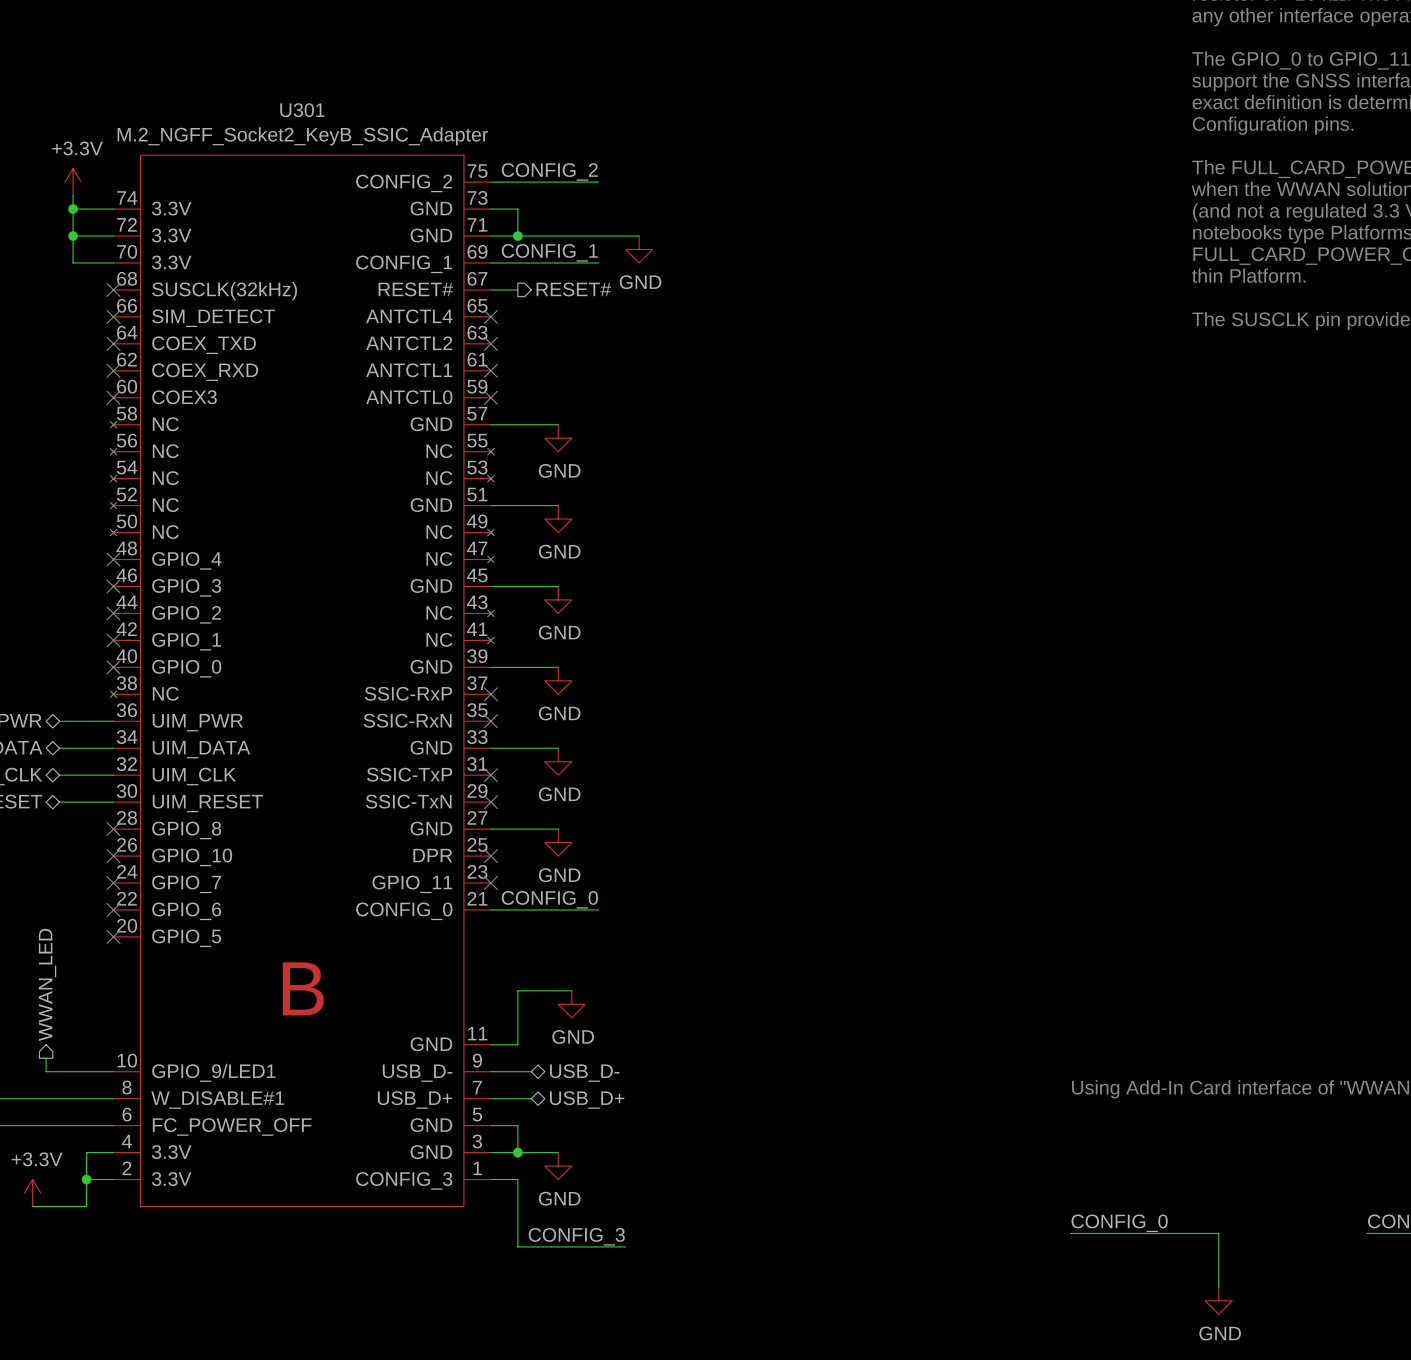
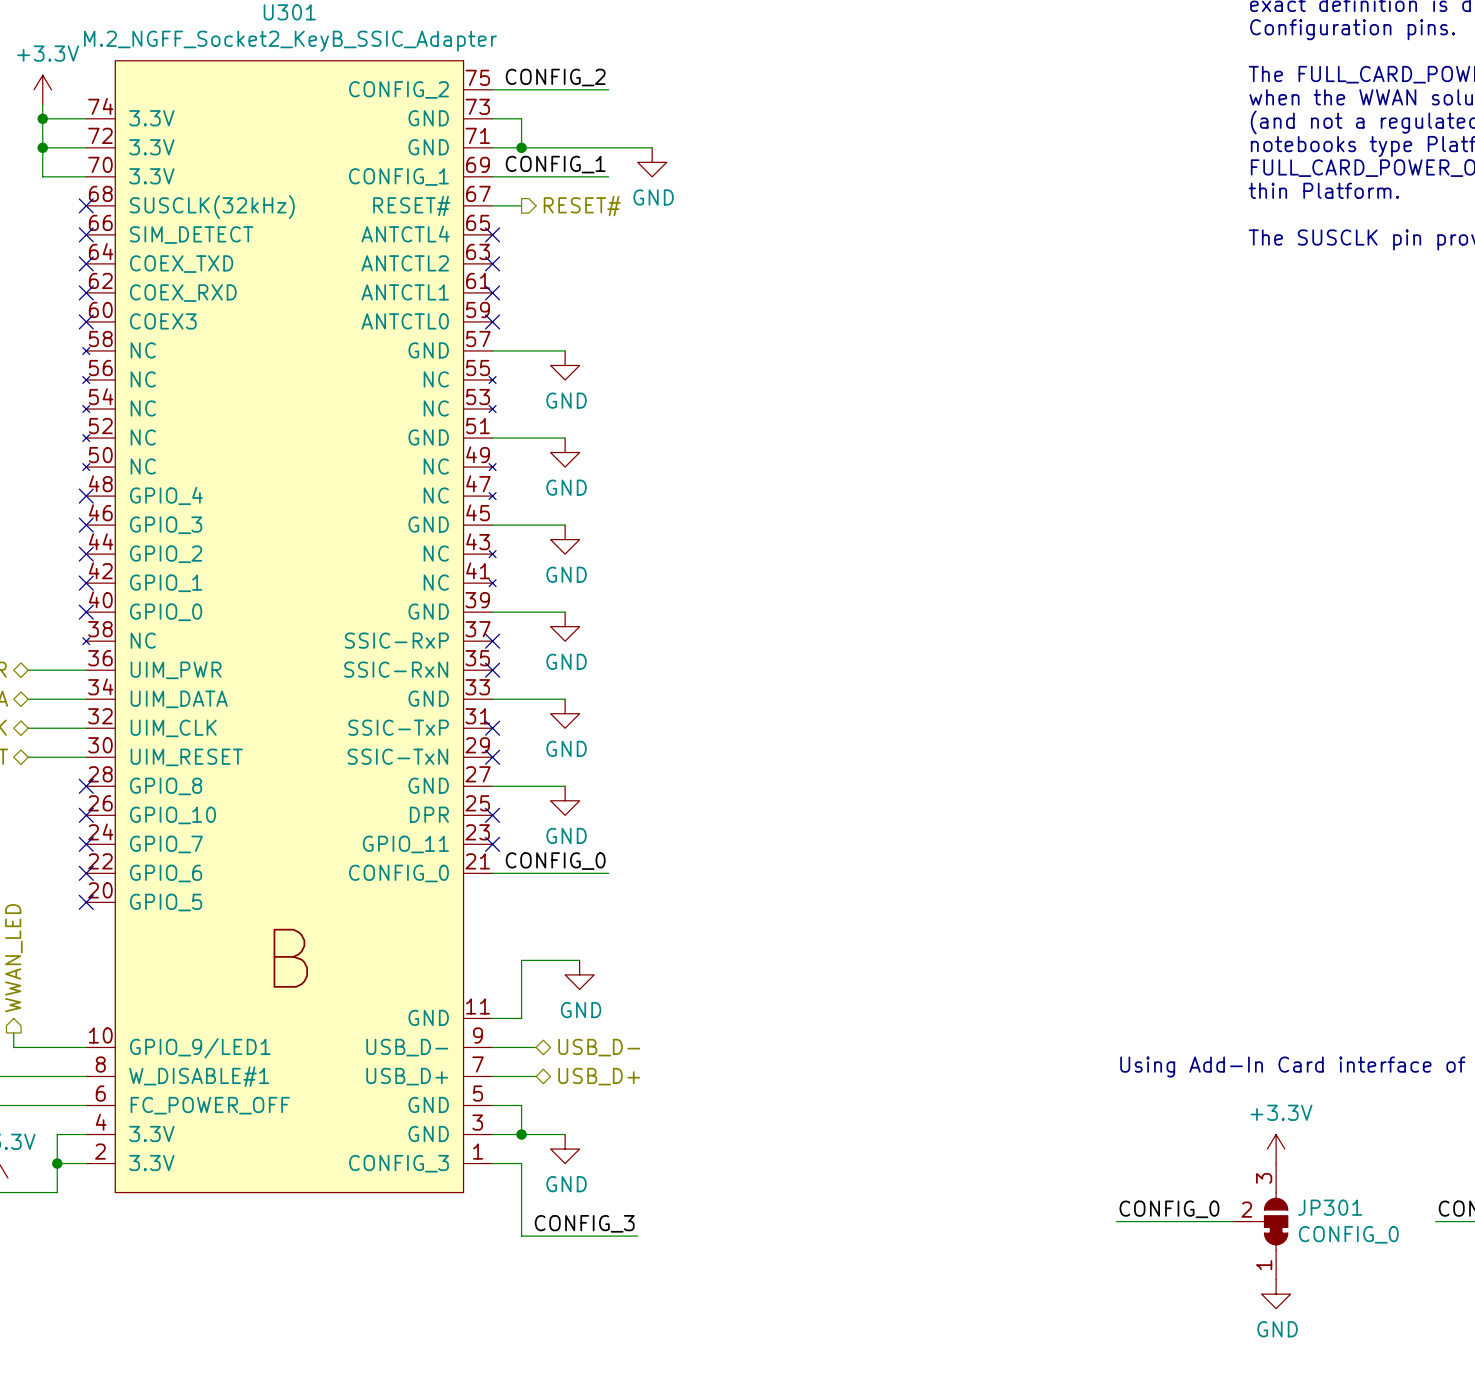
power symbol: none -> +3.3V (1276, 1149)
JP301: none -> CONFIG_0 (1260, 1221)

